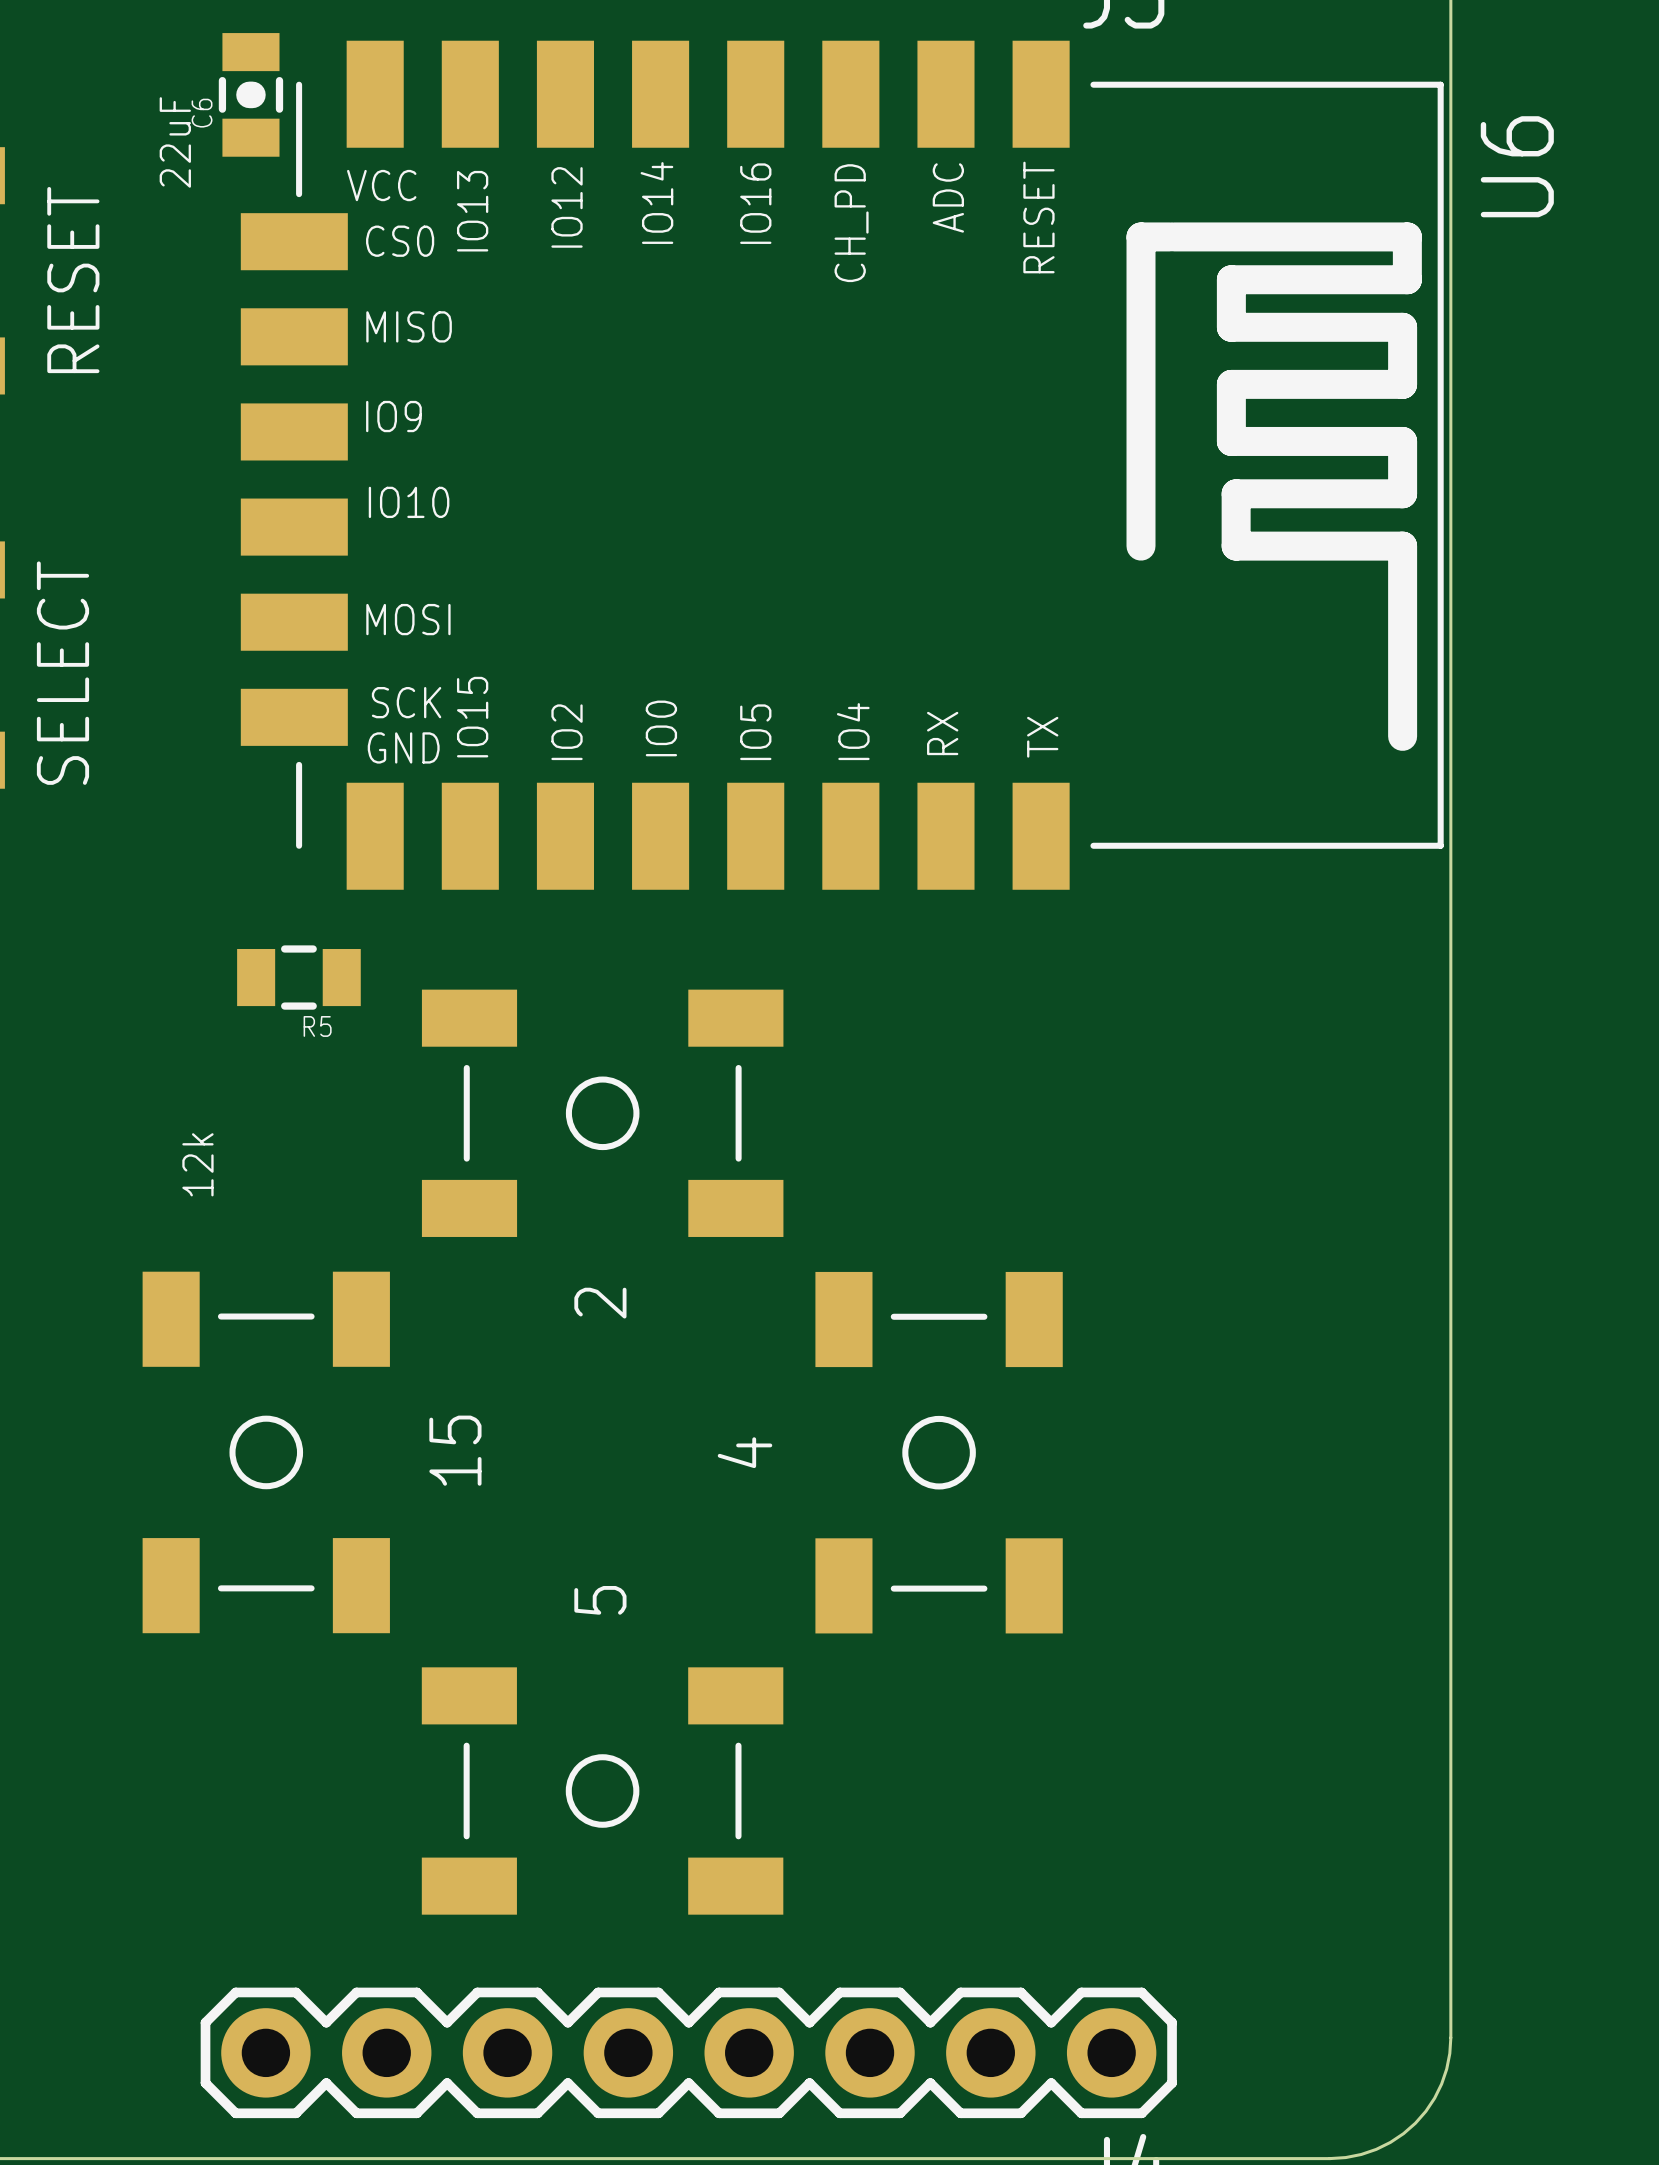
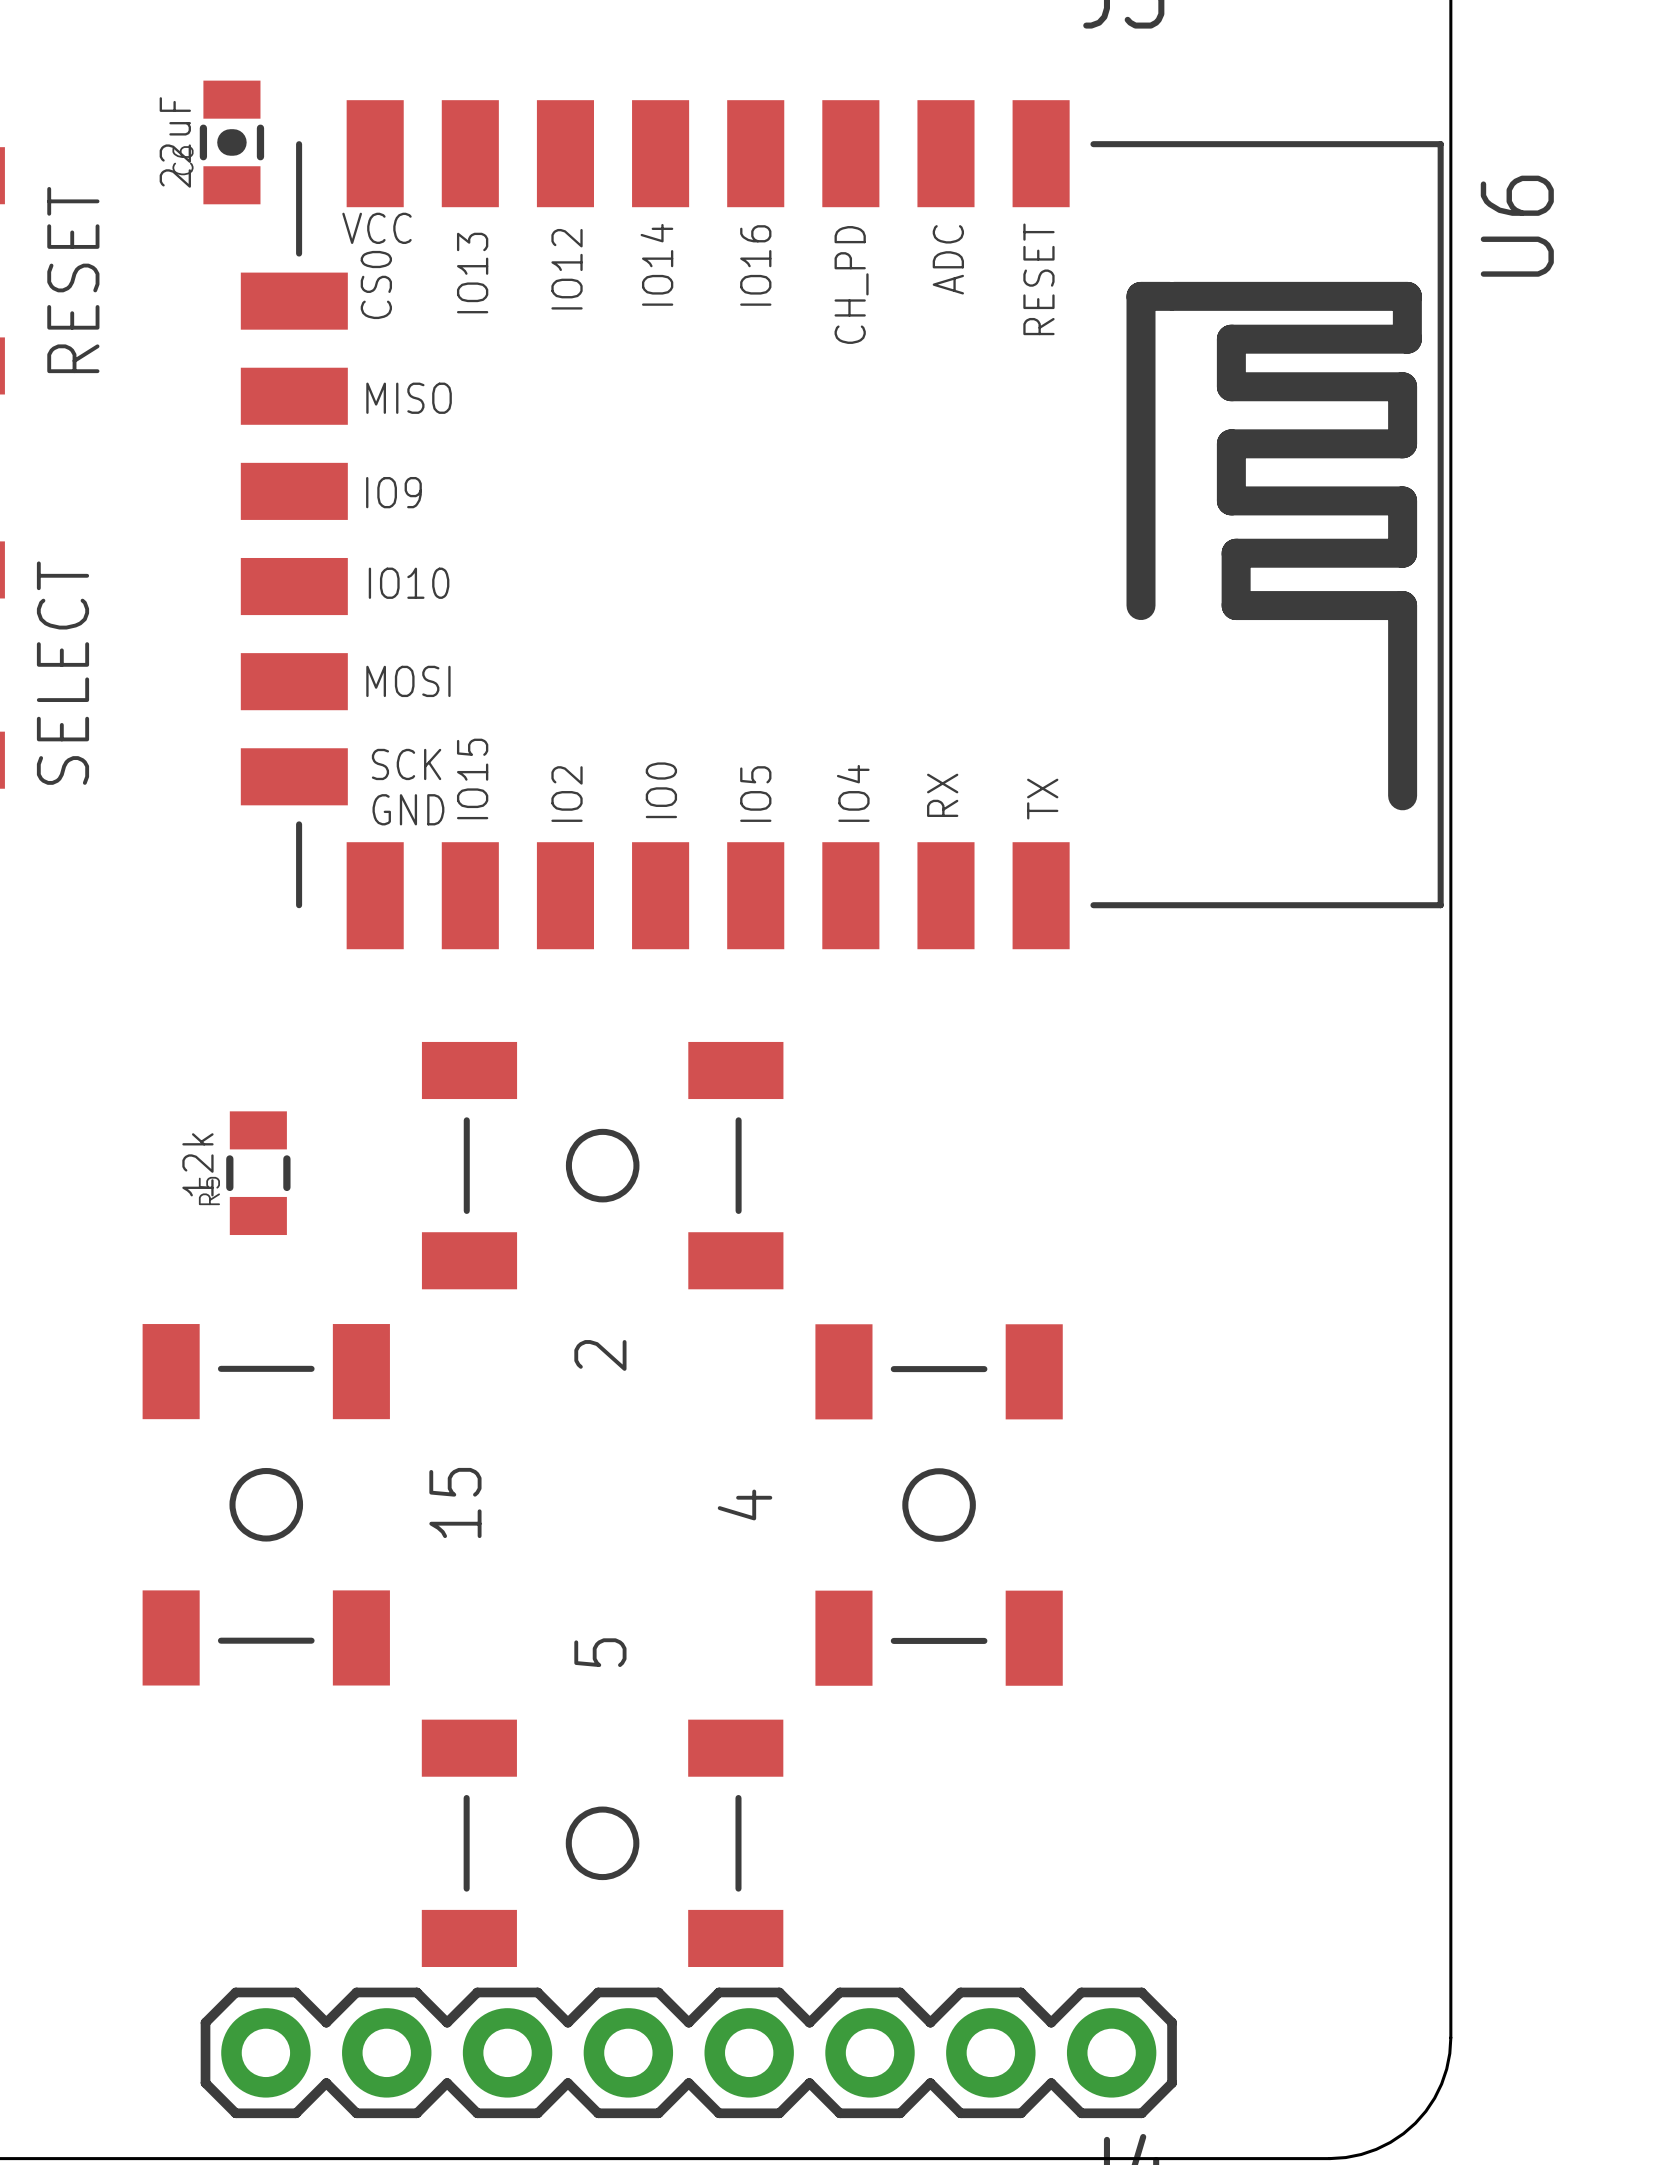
C6 position: (250, 94) -> (231, 142)
text position: VCC (381, 185) -> VCC (376, 228)
text position: ADC (948, 197) -> ADC (948, 259)
text position: IO14 (656, 203) -> IO14 (656, 264)
text position: IO16 (755, 203) -> IO16 (755, 265)
text position: IO12 (567, 207) -> IO12 (567, 269)
text position: IO13 (472, 211) -> IO13 (472, 273)
text position: RESET (1038, 217) -> RESET (1038, 279)
text position: CH_PD (851, 223) -> CH_PD (851, 284)
text rotation: 0° (400, 241) -> 90° counterclockwise (376, 284)
text position: MISO (409, 326) -> MISO (409, 398)
text position: IO9 (393, 416) -> IO9 (393, 492)
U6 position: (842, 465) -> (842, 524)
text position: IO10 (409, 502) -> IO10 (409, 583)
text position: MOSI (408, 619) -> MOSI (408, 681)
text position: SCK (406, 702) -> SCK (406, 764)
text position: IO15 (472, 717) -> IO15 (472, 778)
text position: IO0 (661, 728) -> IO0 (661, 790)
text position: IO4 (853, 731) -> IO4 (853, 793)
text position: IO2 (567, 732) -> IO2 (567, 794)
text position: IO5 (755, 732) -> IO5 (755, 794)
text position: RX (942, 733) -> RX (942, 795)
text position: TX (1042, 737) -> TX (1042, 799)
text position: GND (403, 747) -> GND (408, 809)
R5 rotation: 0° (298, 977) -> 90° clockwise (258, 1173)
R5 position: (298, 977) -> (258, 1173)
part position: (602, 1113) -> (602, 1165)
text position: 2 (600, 1303) -> 2 (600, 1355)
text position: 15 (455, 1450) -> 15 (455, 1502)
part position: (266, 1452) -> (266, 1504)
text position: 4 (745, 1452) -> 4 (745, 1504)
part position: (939, 1452) -> (939, 1505)
text position: 5 (600, 1600) -> 5 (600, 1652)
part position: (602, 1791) -> (602, 1843)

